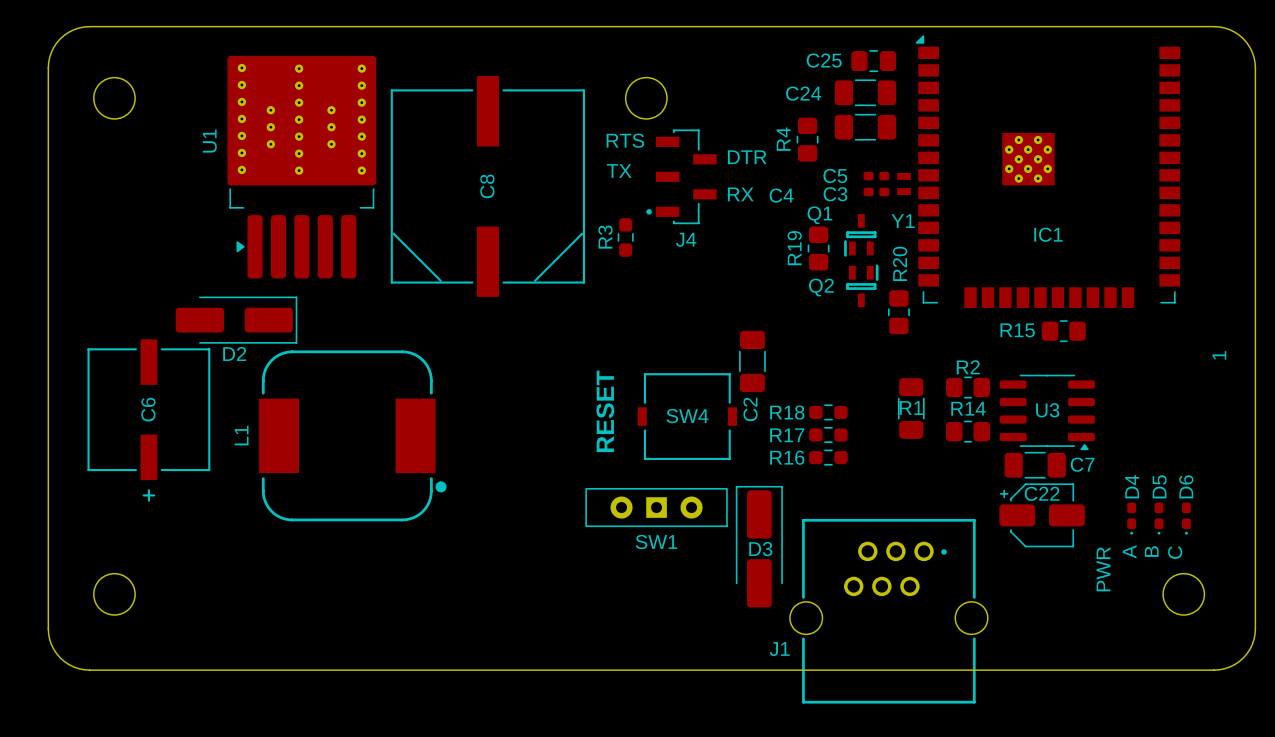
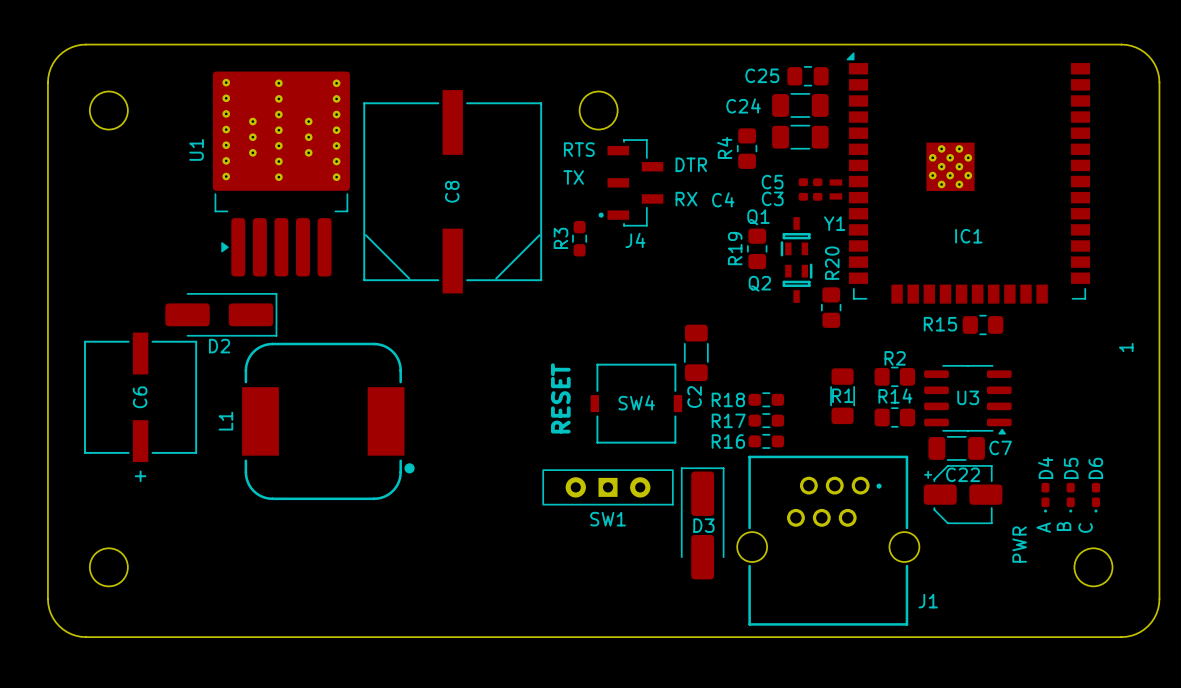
J1 position: (888, 611) -> (828, 540)
J1 name position: J1 (779, 649) -> J1 (928, 601)

